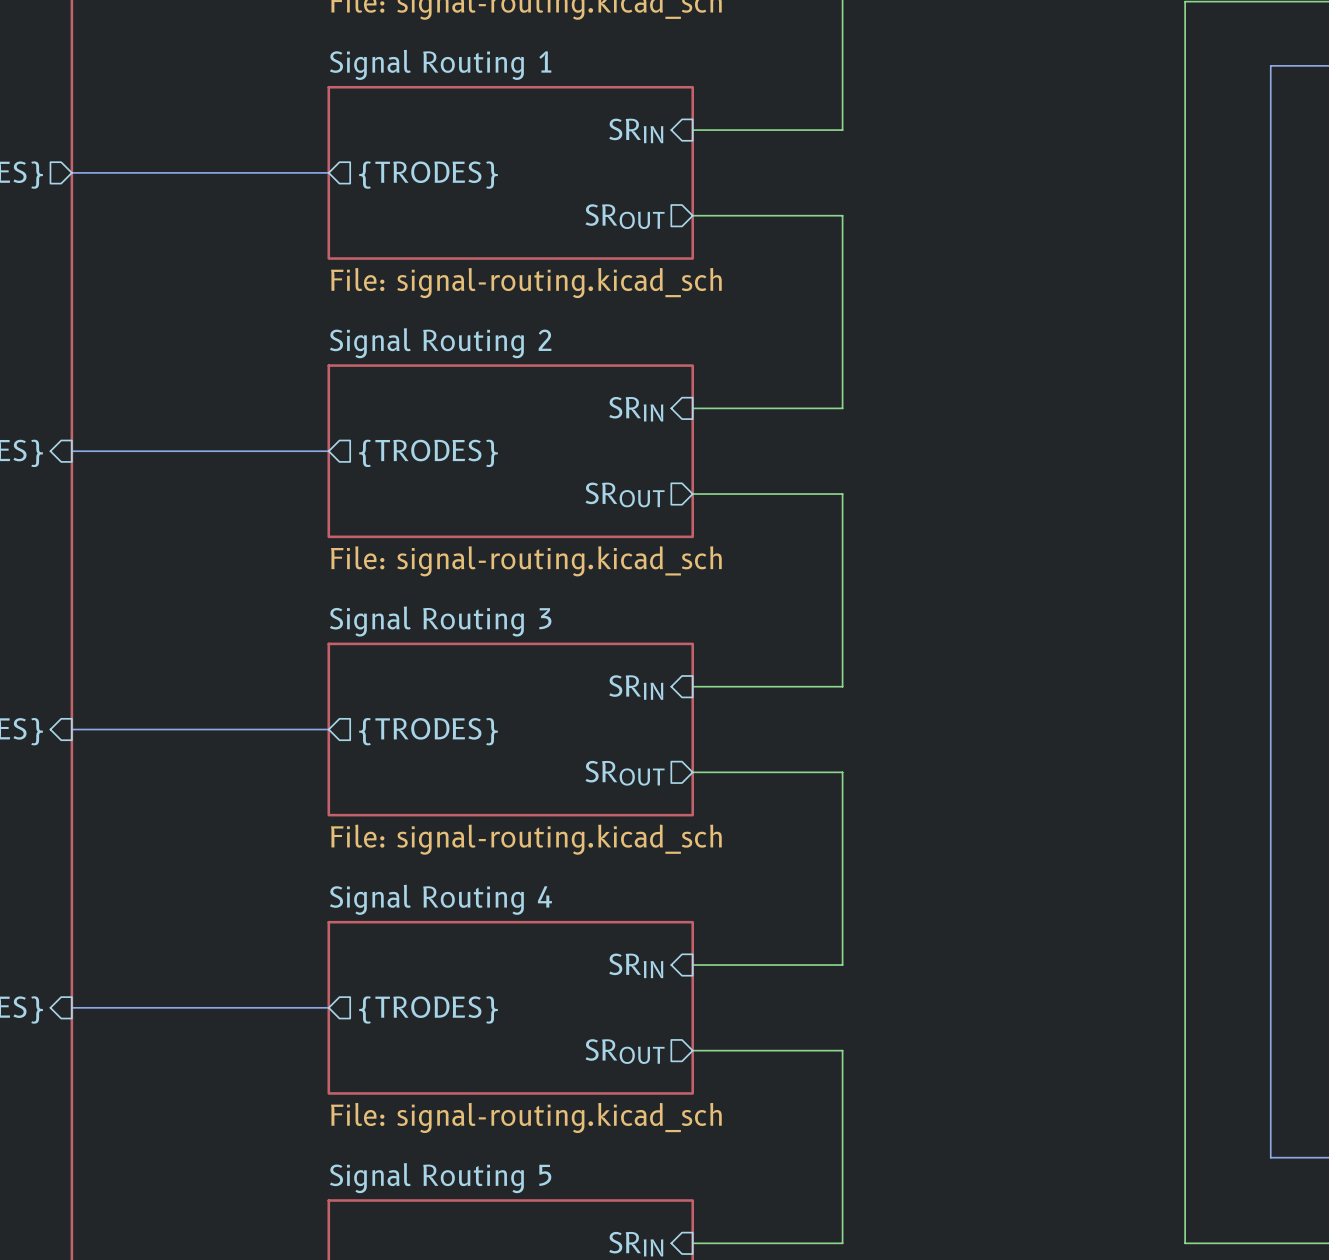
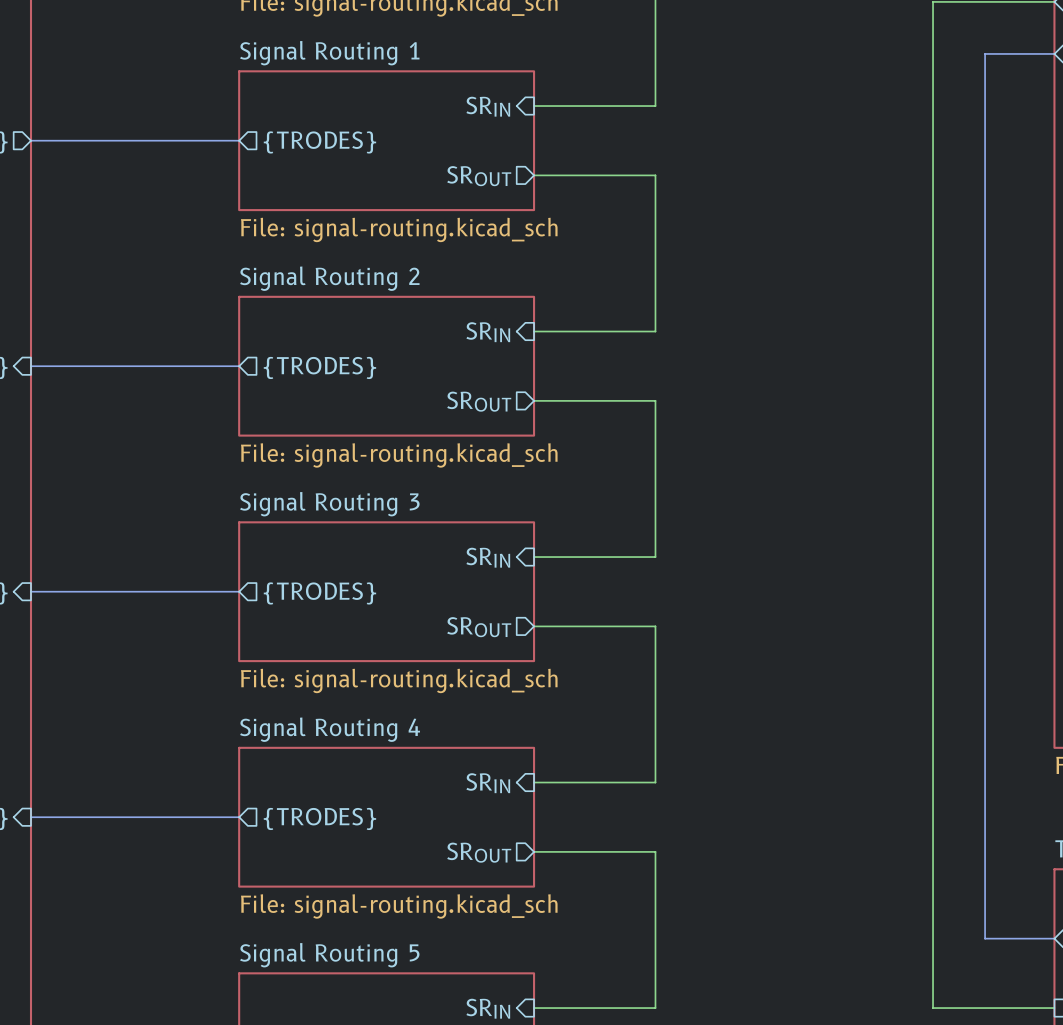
bus: (1270, 65) (1270, 1157) -> (1002, 53) (985, 53) (985, 938) (1002, 938)

